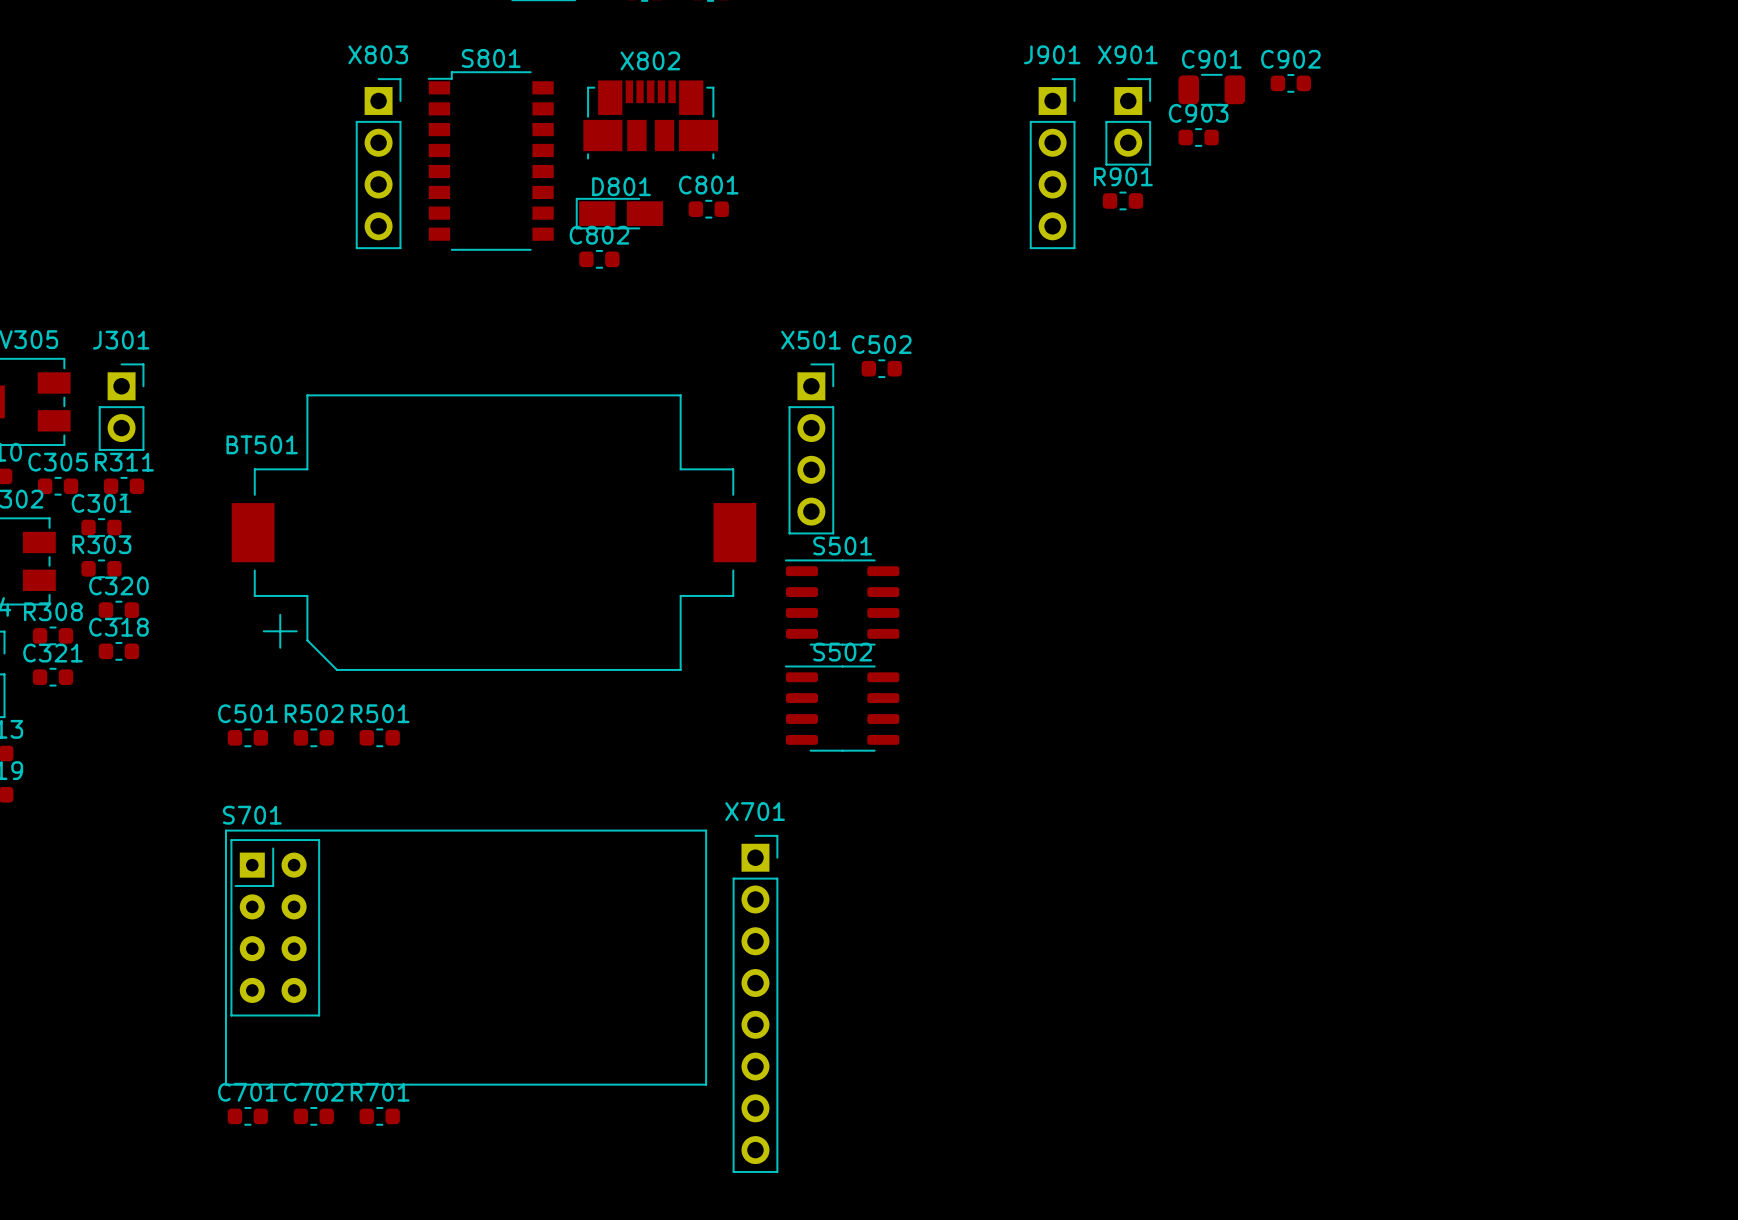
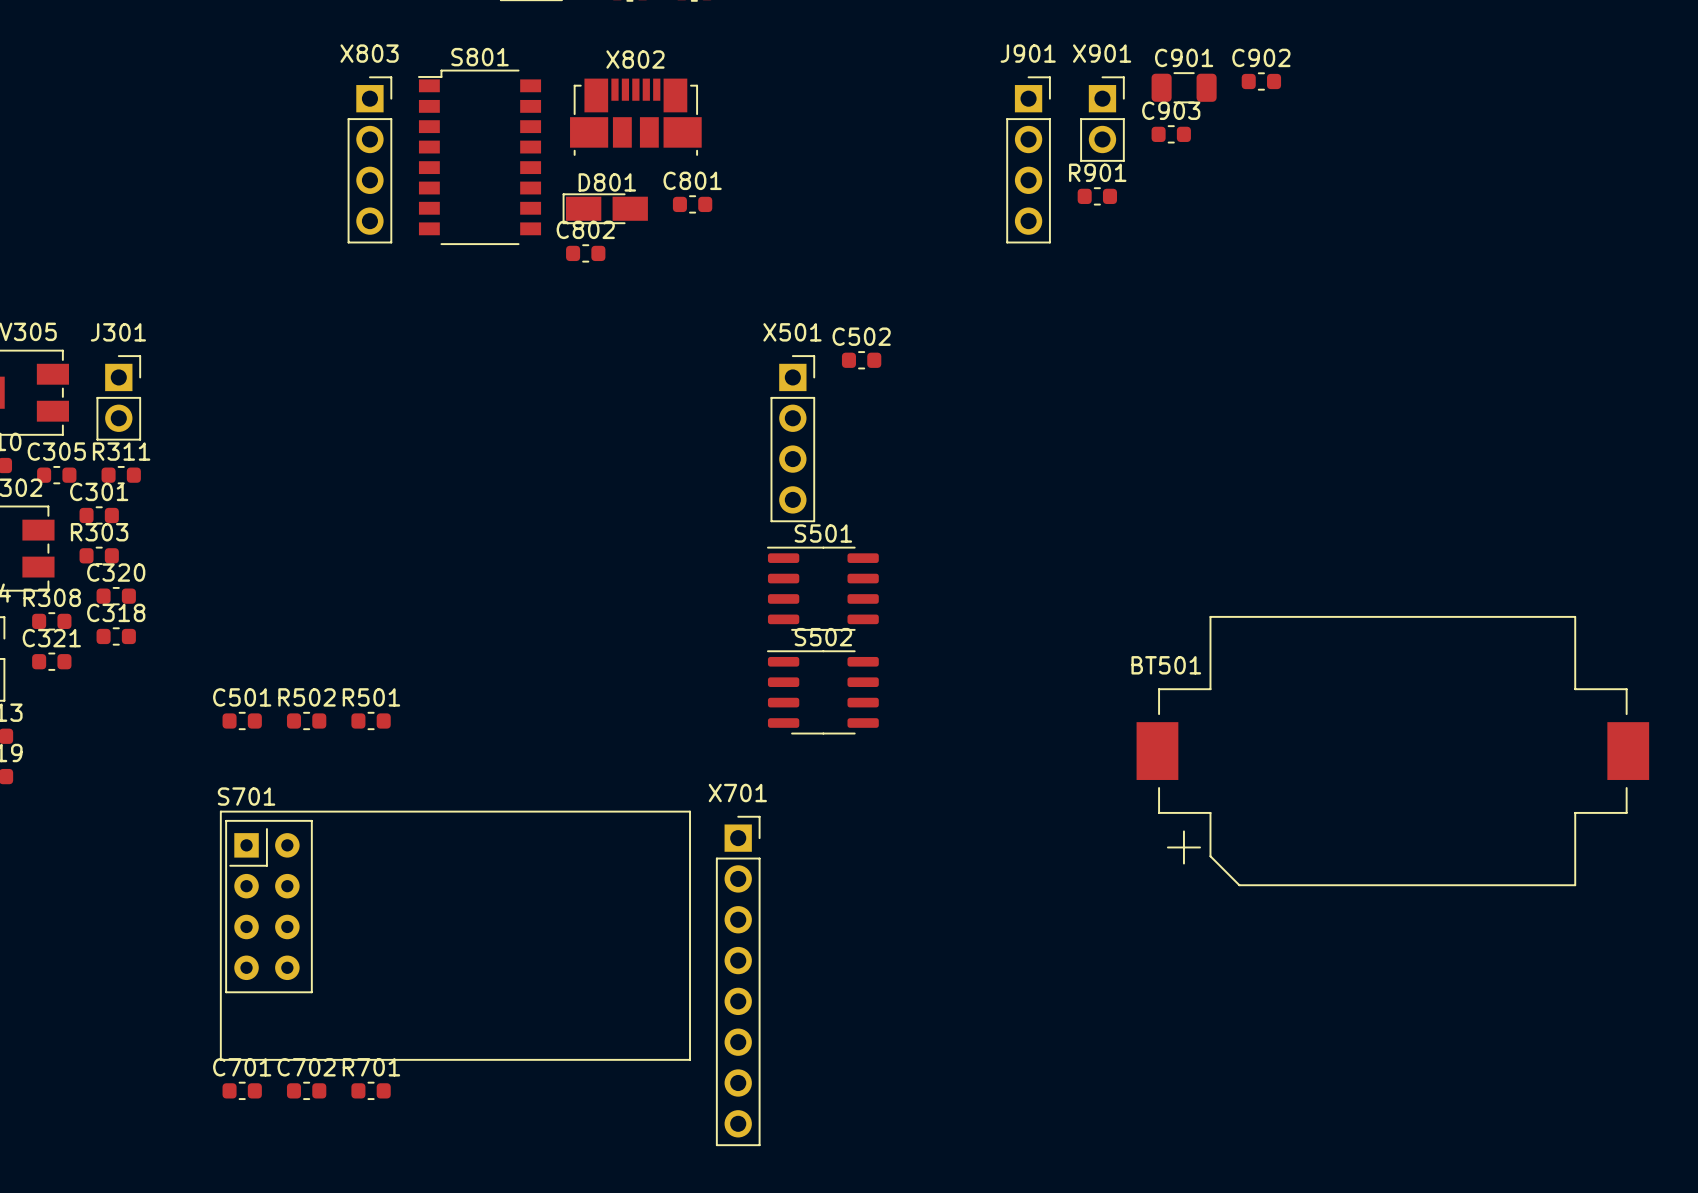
BT501 position: (494, 532) -> (1392, 751)

